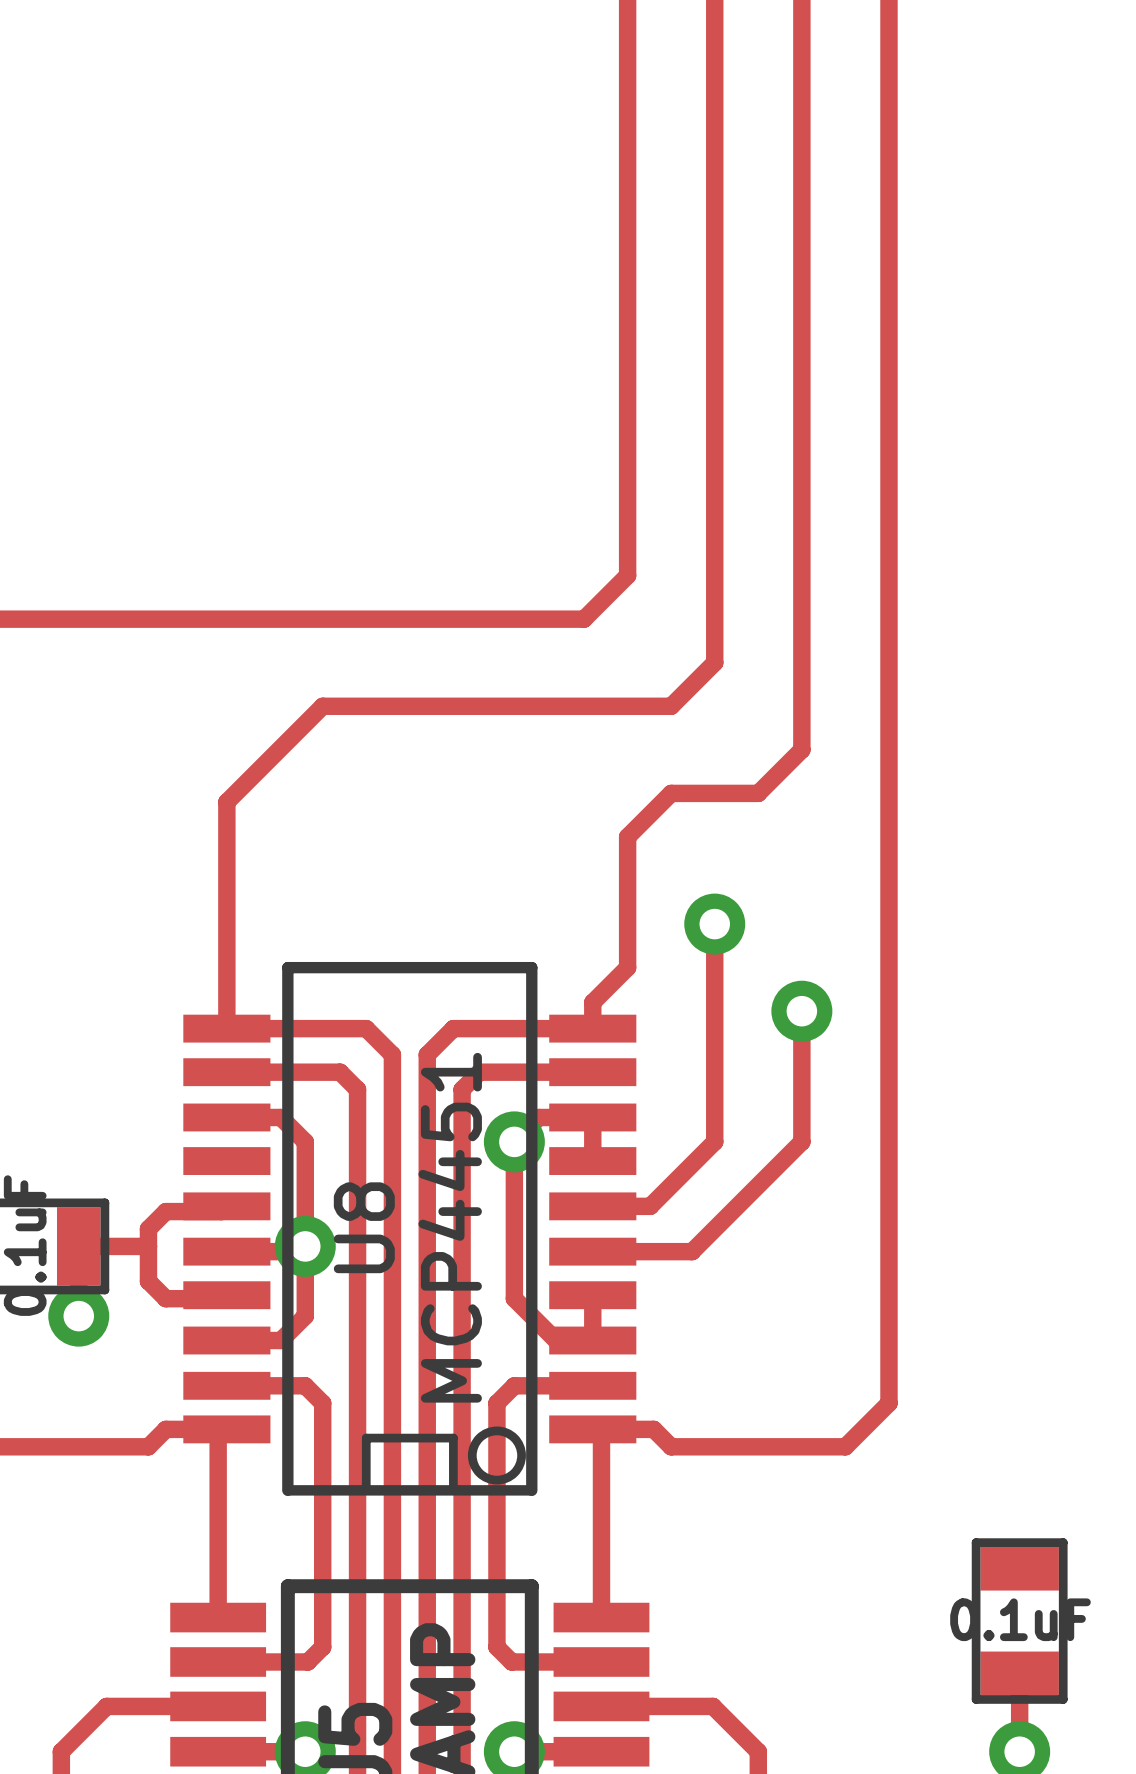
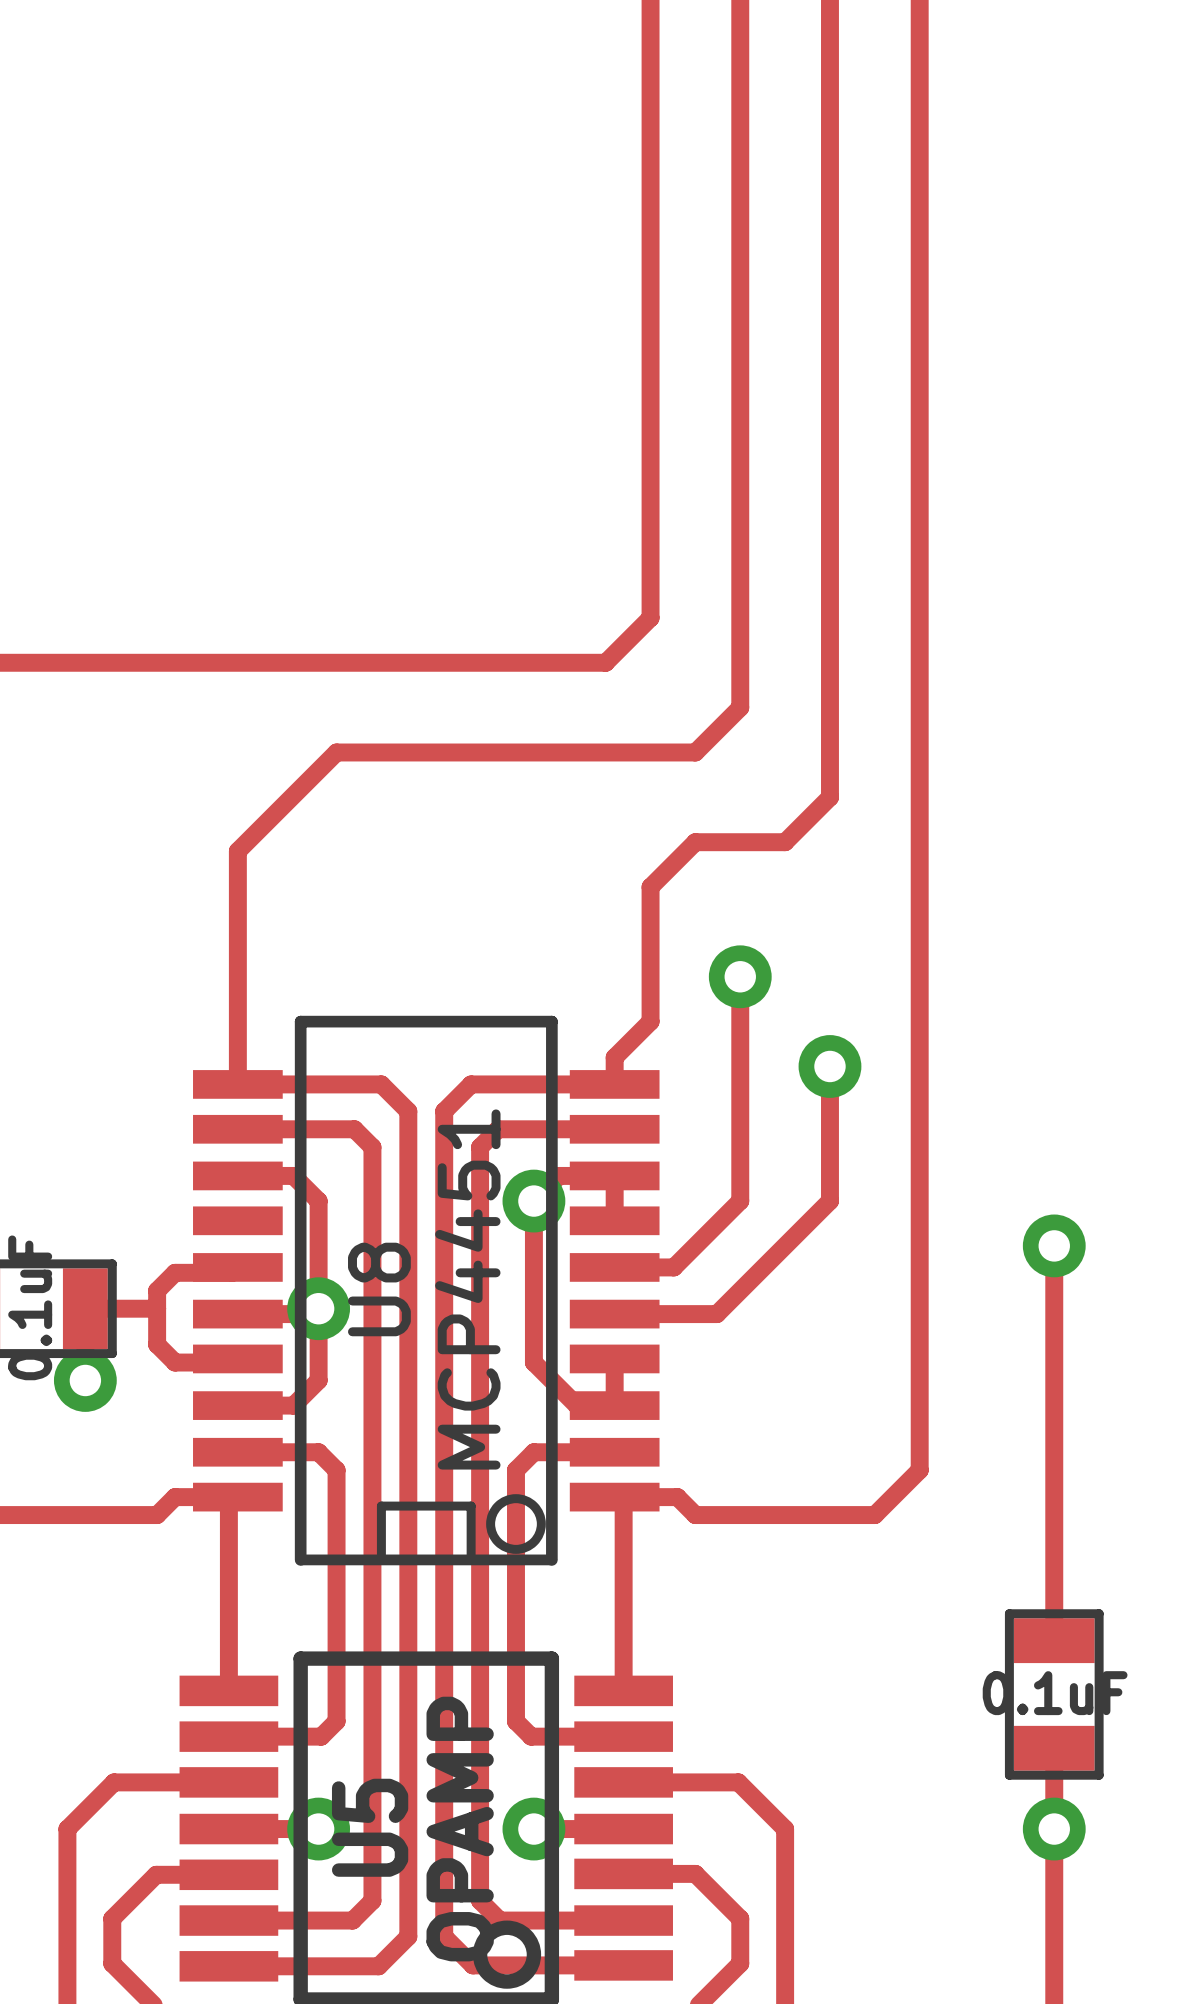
track: none -> (1054, 1245) (1054, 1640)
via: none -> (1054, 1245)

